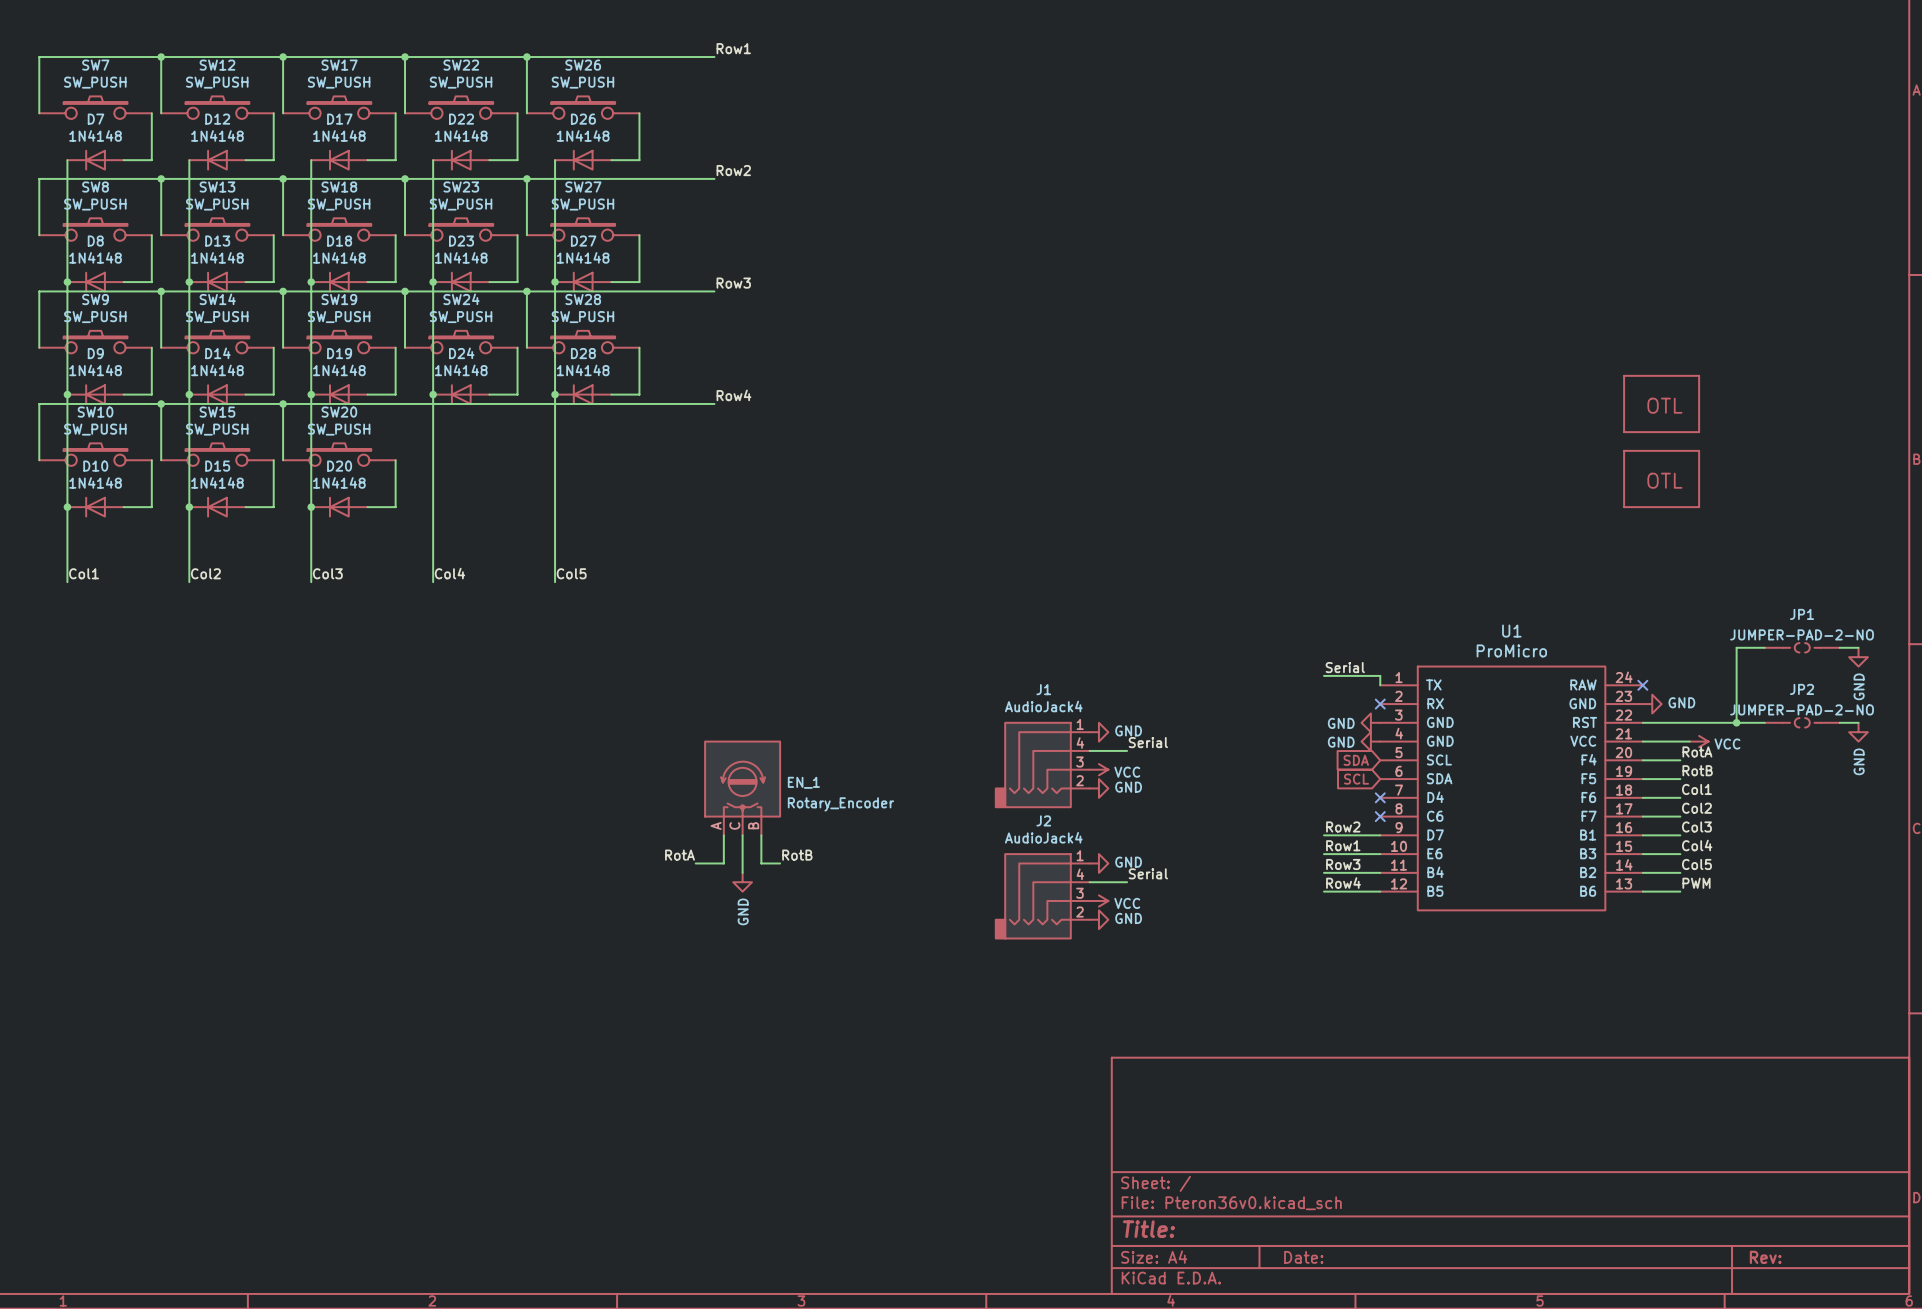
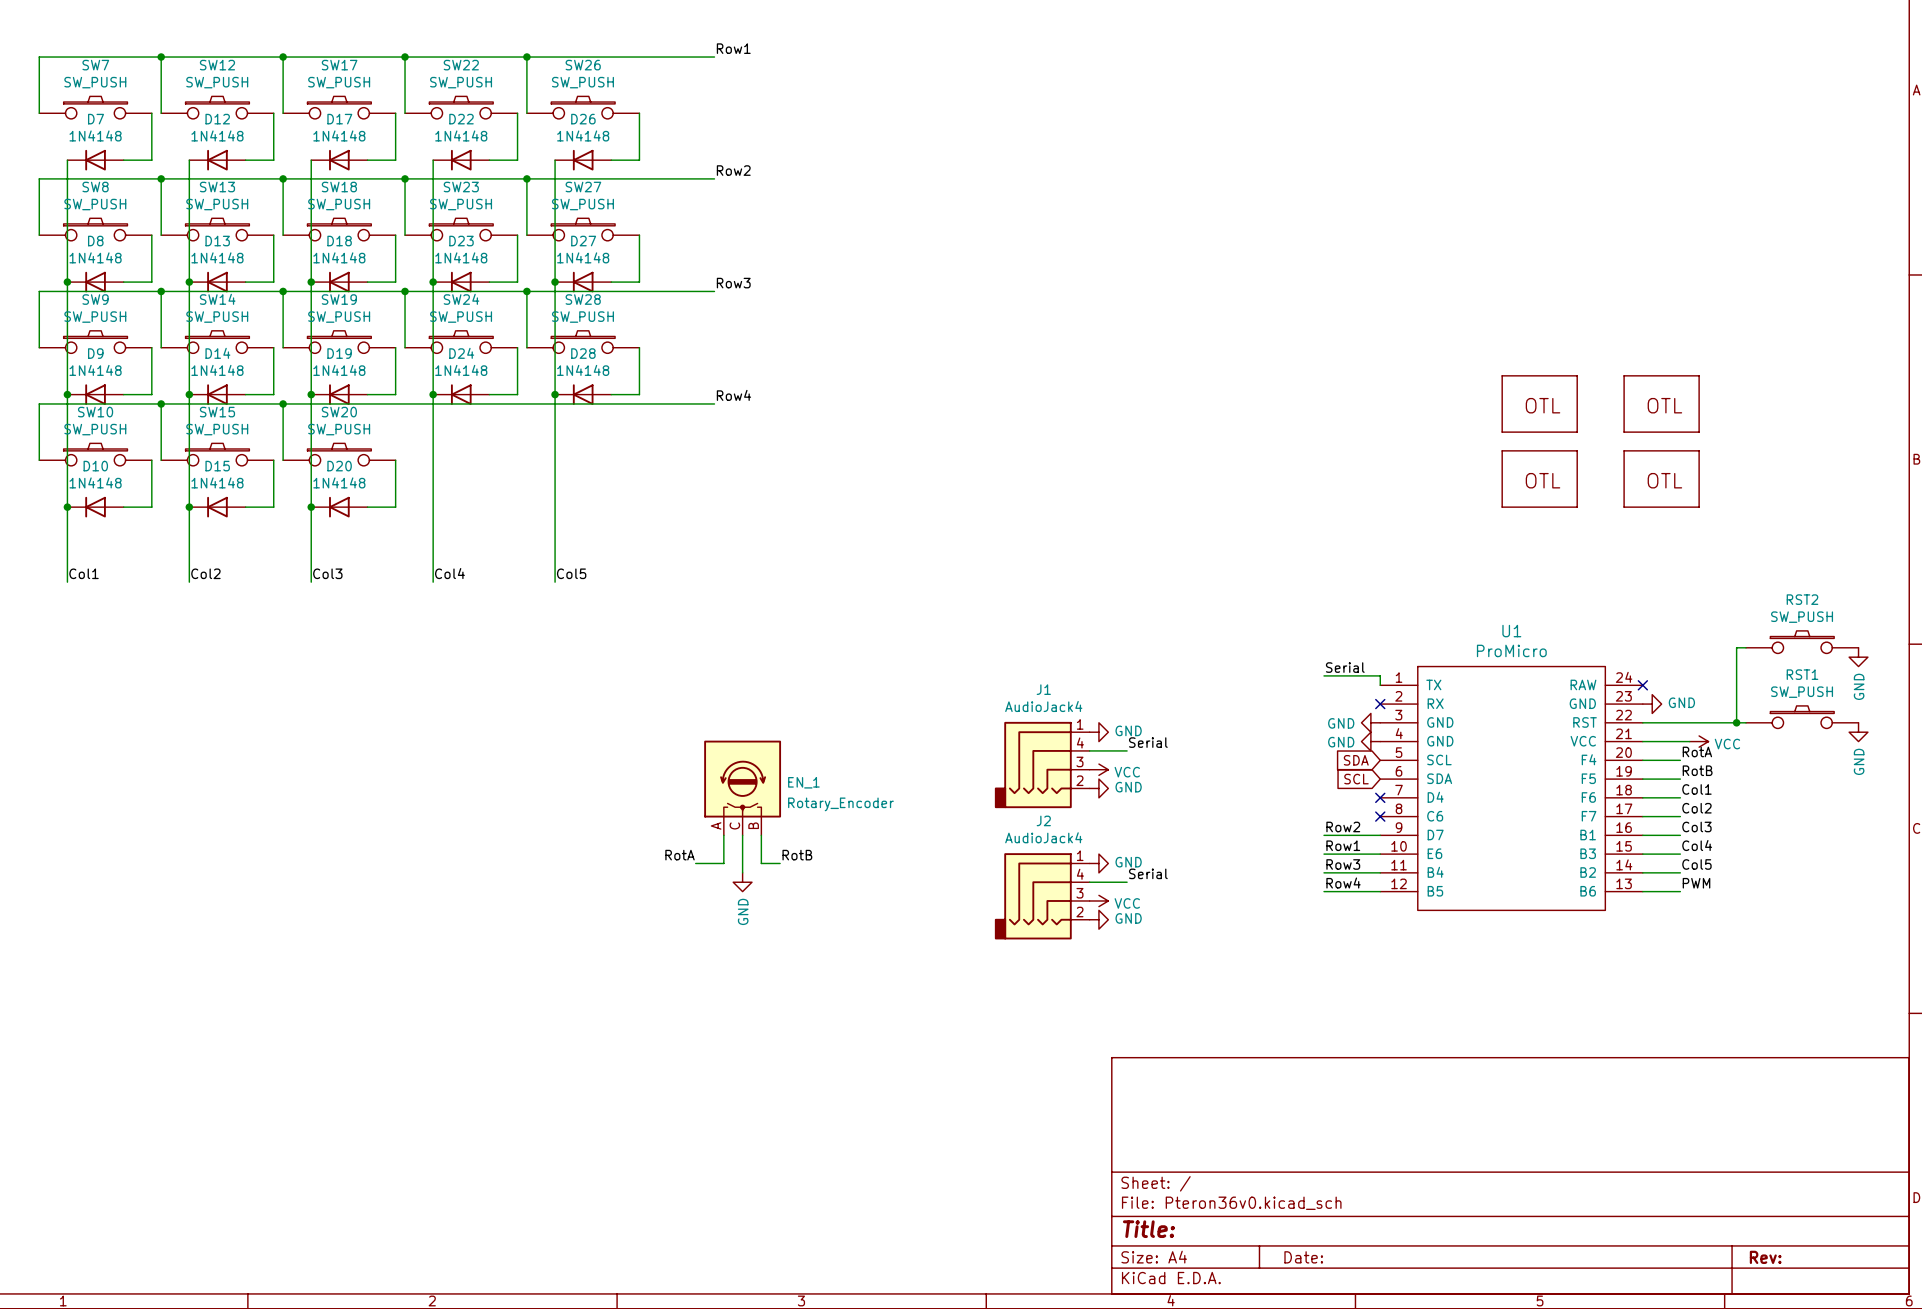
part: none -> (1539, 403)
part: none -> (1539, 479)
RST2: none -> SW_PUSH (1802, 642)
JP1: JUMPER-PAD-2-NO (1802, 647) -> none
RST1: none -> SW_PUSH (1802, 717)
JP2: JUMPER-PAD-2-NO (1802, 722) -> none

